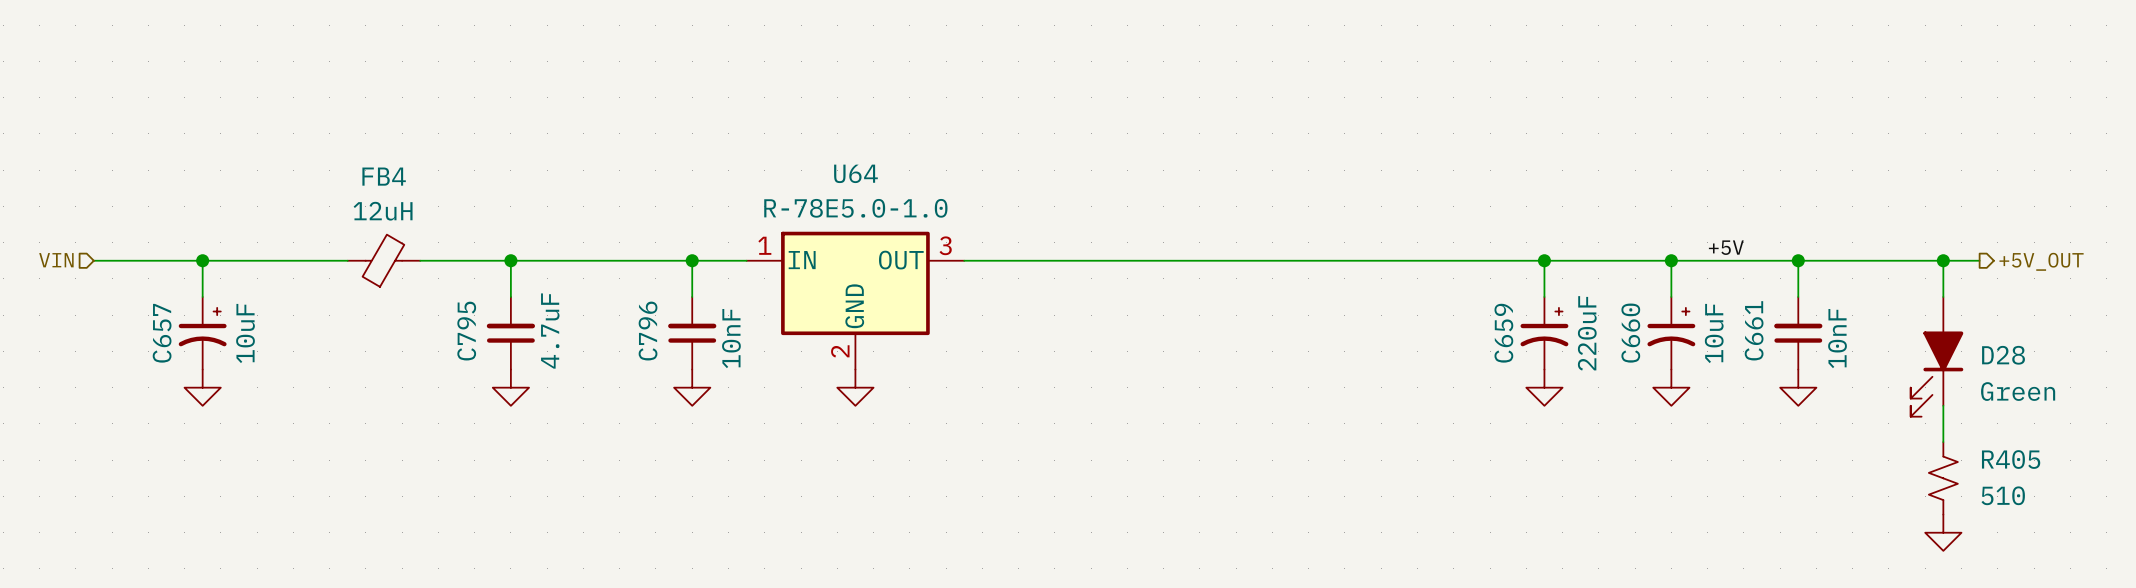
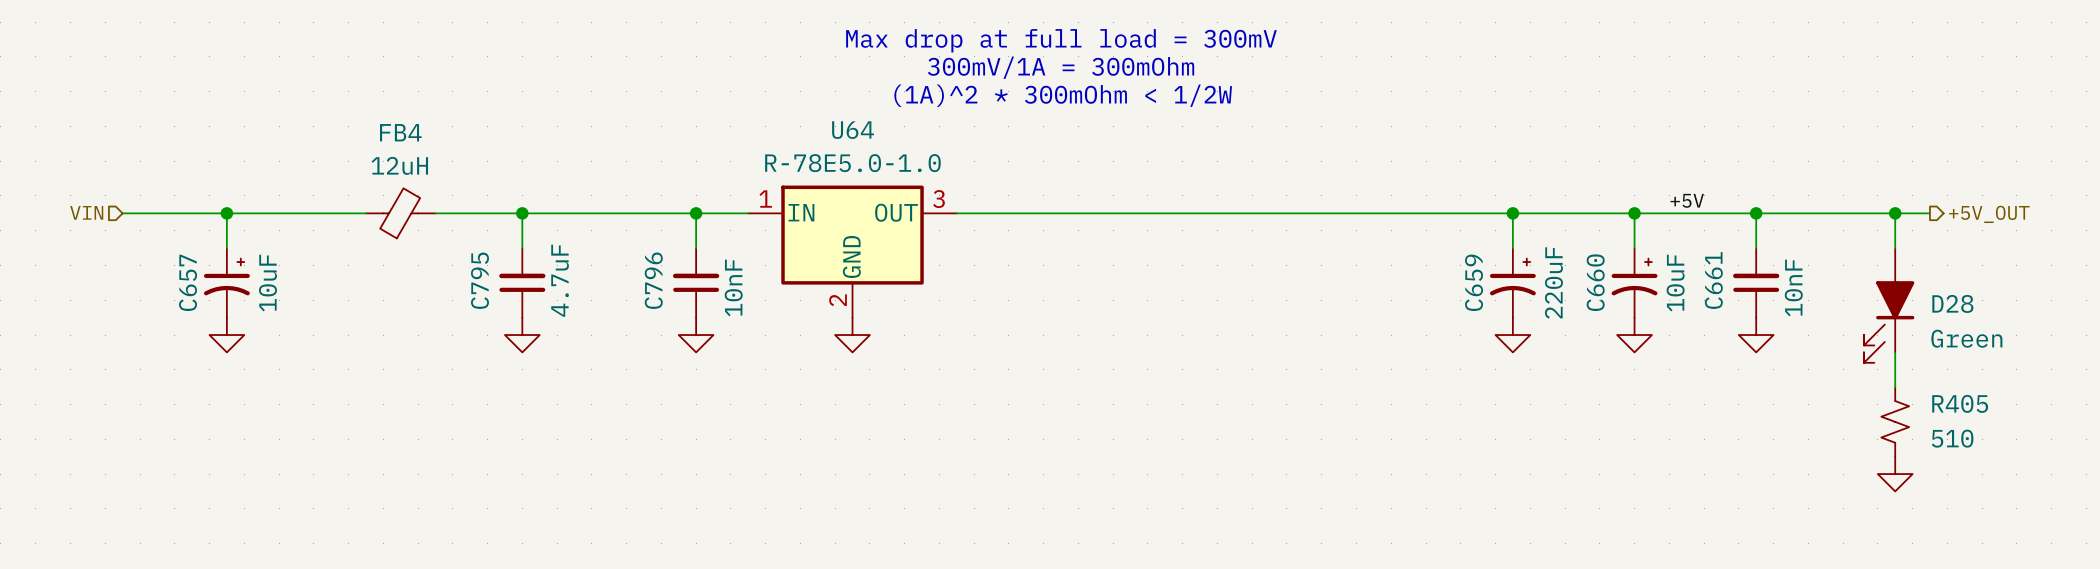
text: none -> Max drop at full load = 300mV (1061, 40)
text: none -> 300mV/1A = 300mOhm (1060, 67)
text: none -> (1A)^2 * 300mOhm < 1/2W (1063, 95)

